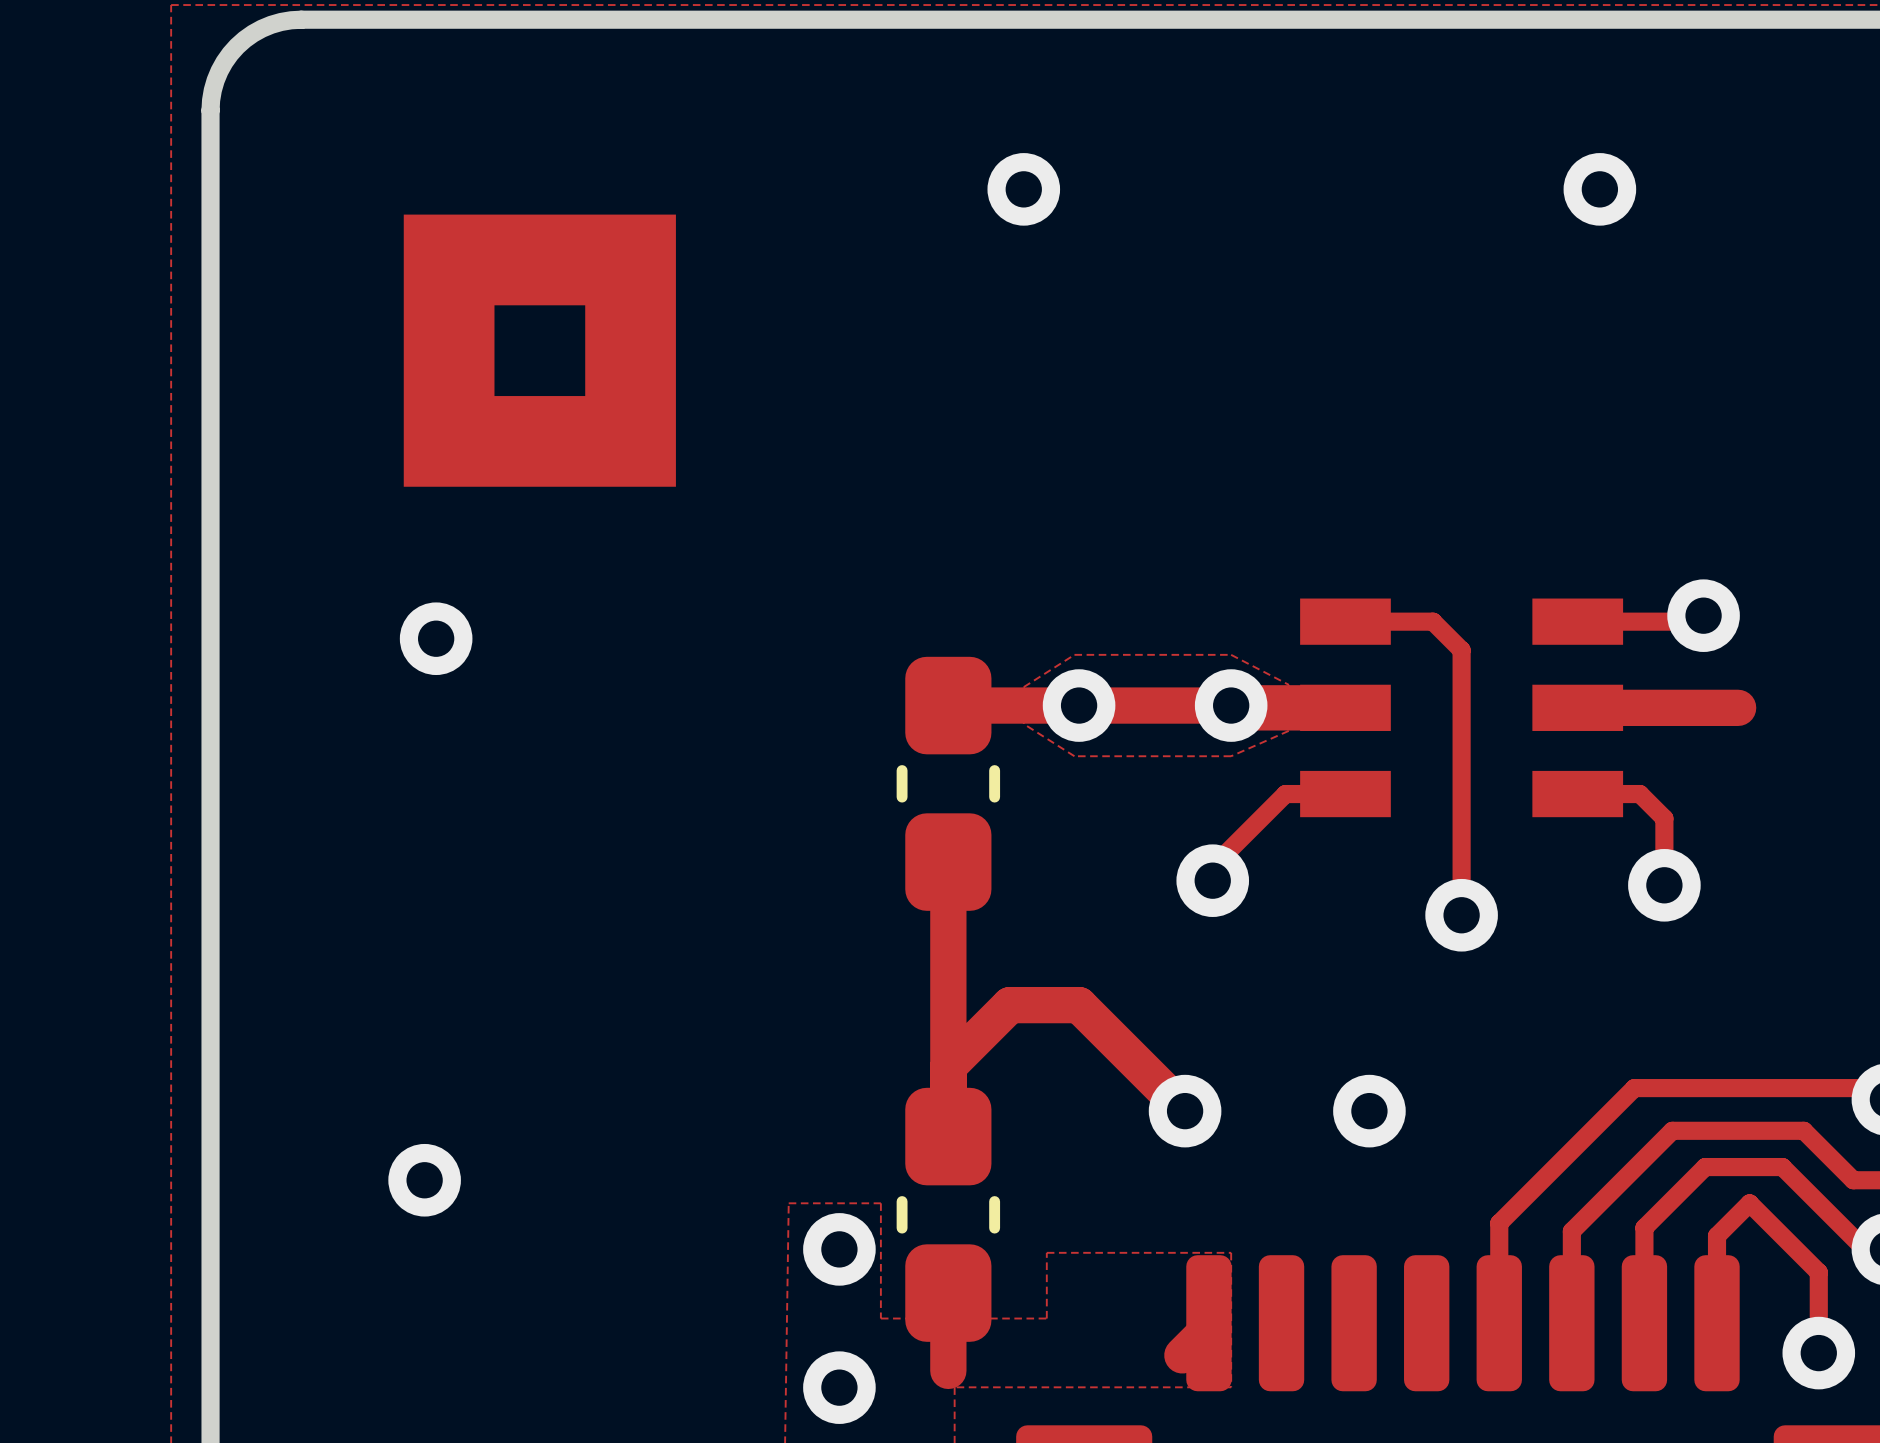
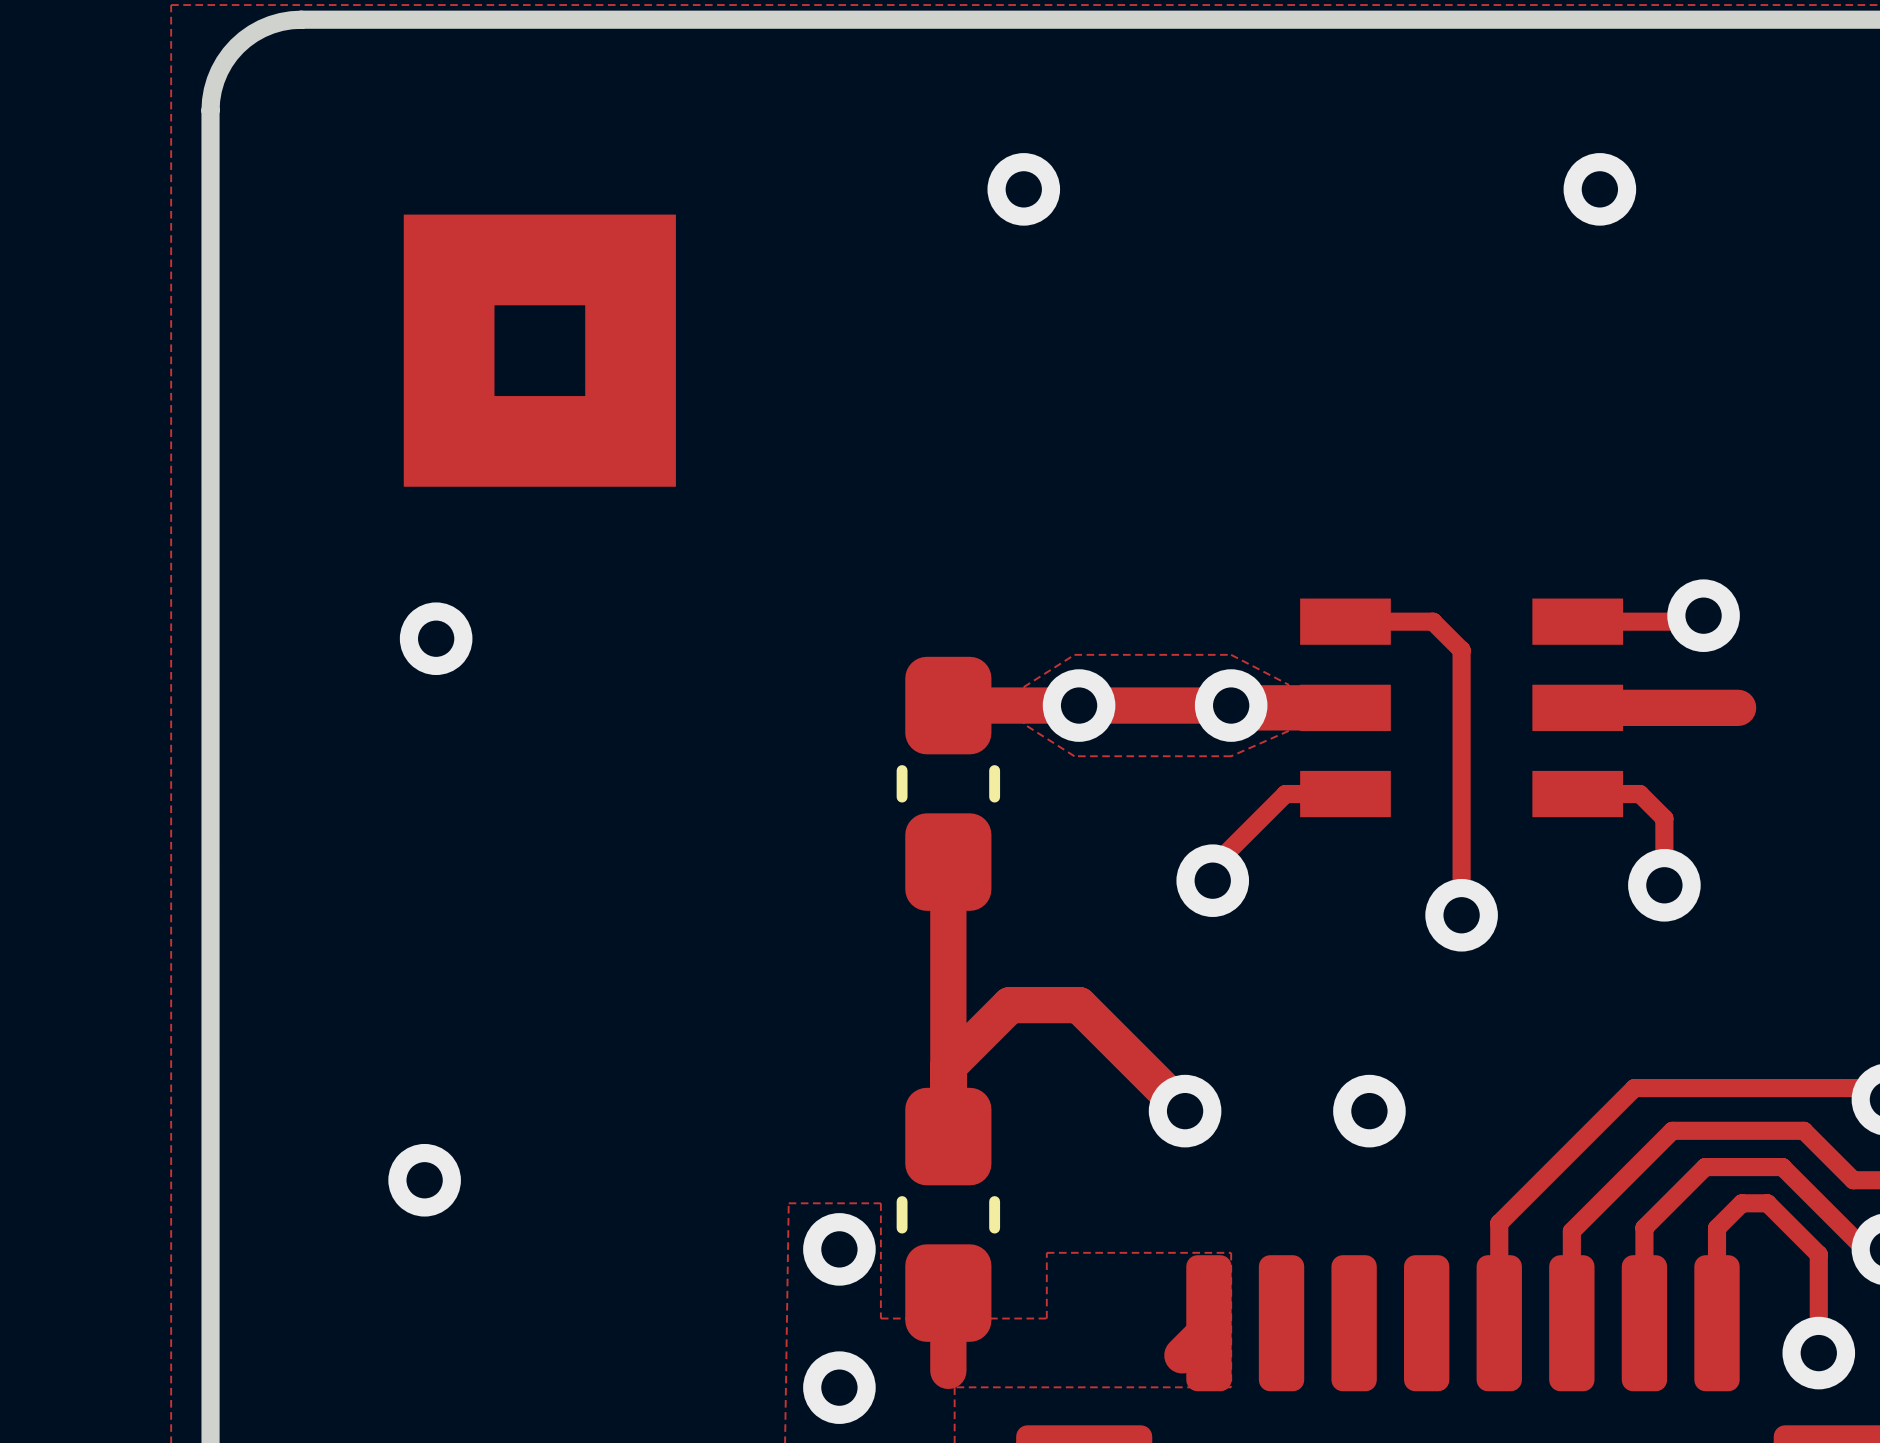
track: (1717, 1235) (1749, 1203) (1818, 1272) -> (1717, 1235) (1717, 1228) (1741, 1203) (1767, 1203) (1818, 1254) (1818, 1272)

